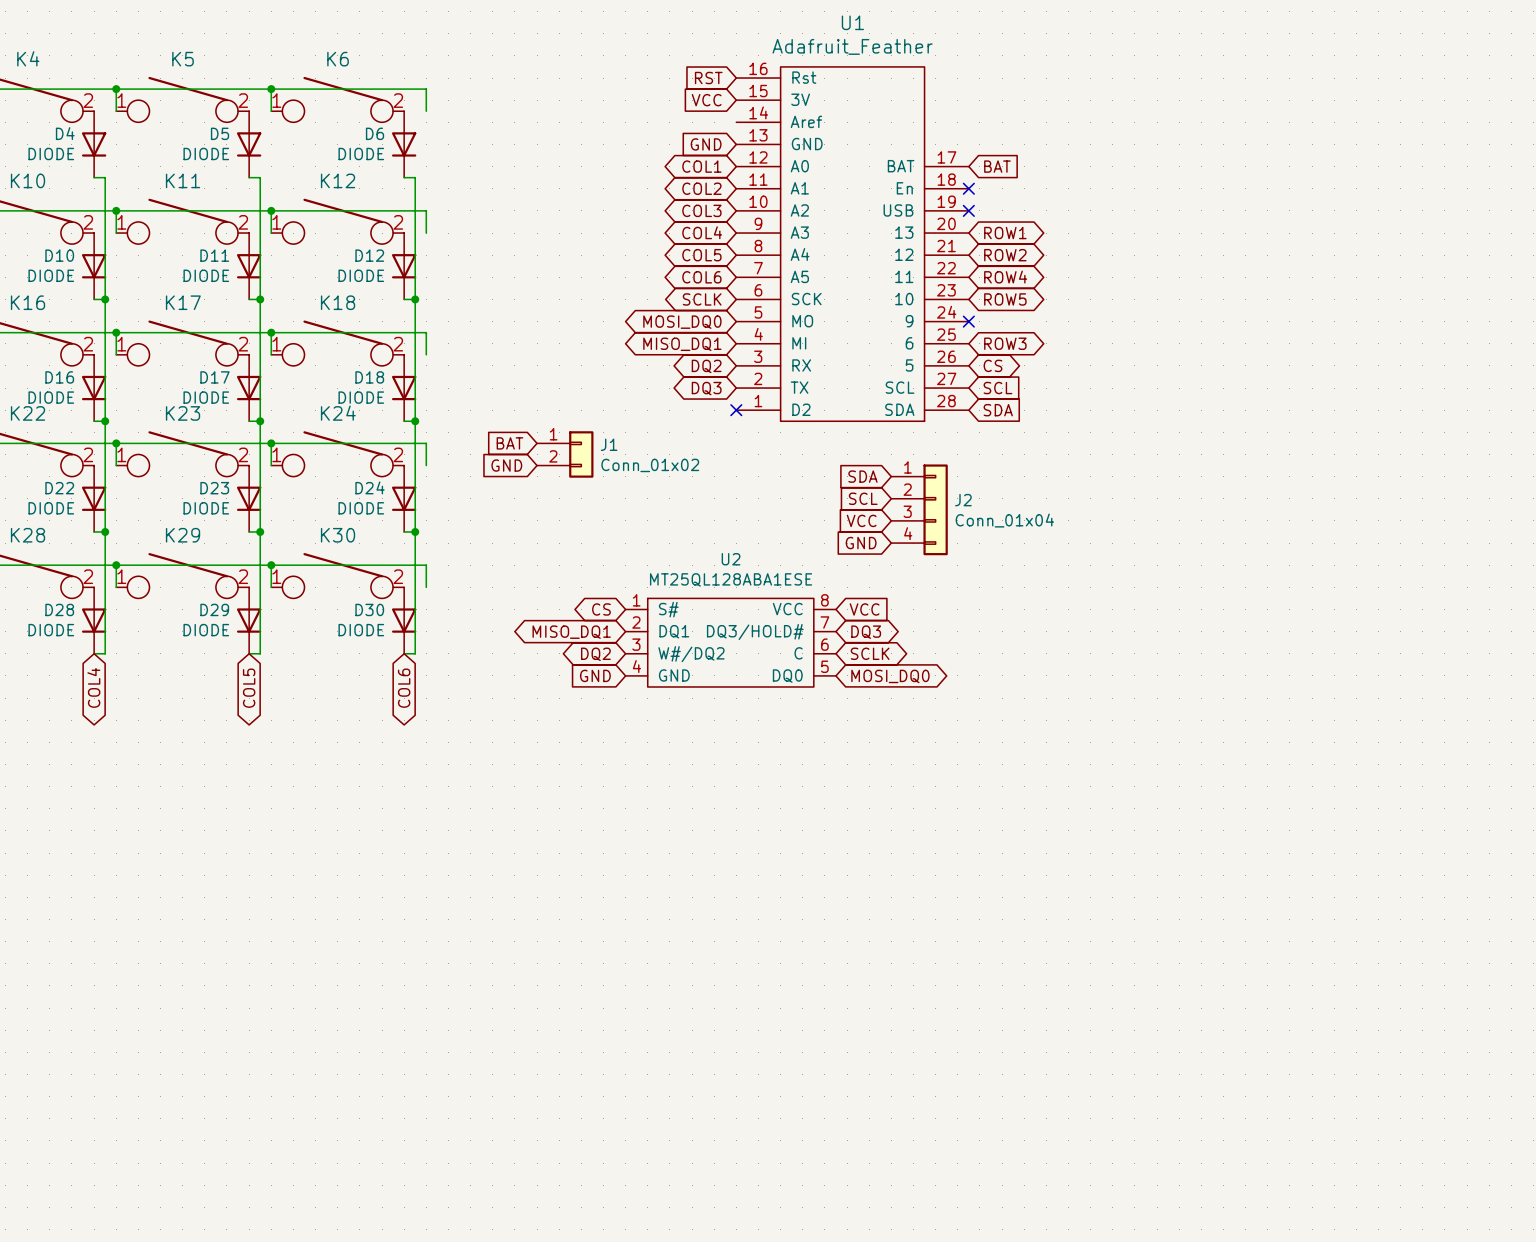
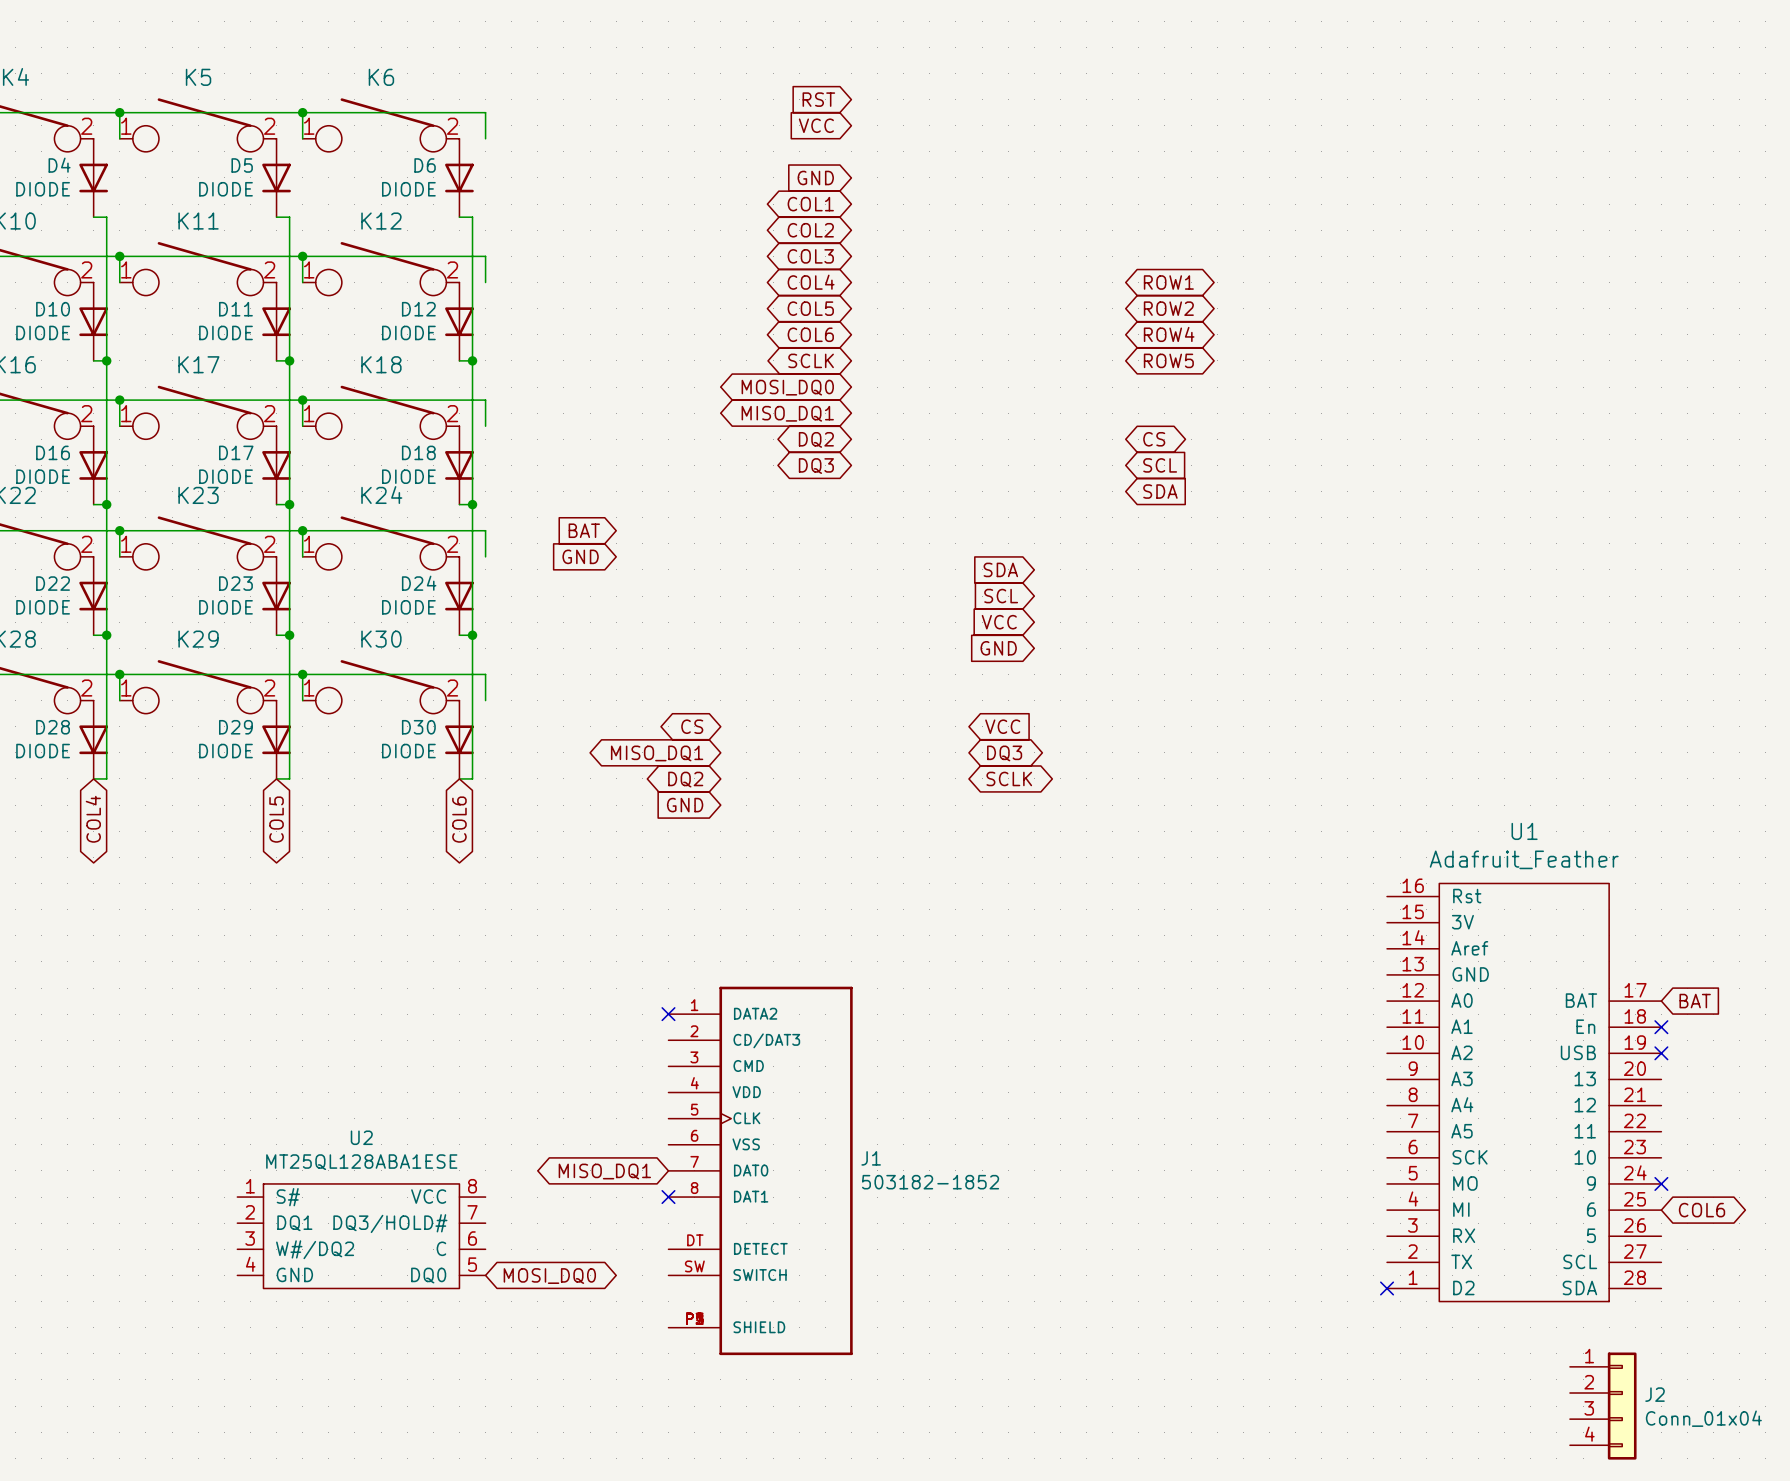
global label: BAT (997, 166) -> none
no-connect mark: (968, 188) -> none
no-connect mark: (968, 210) -> none
U1 position: (852, 244) -> (1524, 1092)
no-connect mark: (968, 321) -> none
global label: ROW3 (1005, 343) -> none
no-connect mark: (736, 410) -> none
J1 symbol: [537, 431, 594, 478] -> [668, 986, 853, 1356]
J1 name position: J1 (609, 444) -> J1 (871, 1158)
J1 value: Conn_01x02 (650, 465) -> 503182-1852 (930, 1182)
J2 position: (919, 509) -> (1603, 1406)
U2 position: (730, 642) -> (361, 1236)
global label: MOSI_DQ0 (890, 676) -> none
global label: none -> BAT (1695, 1001)
no-connect mark: none -> (668, 1014)
no-connect mark: none -> (1661, 1027)
no-connect mark: none -> (1661, 1053)
global label: none -> MISO_DQ1 (604, 1171)
no-connect mark: none -> (1661, 1183)
no-connect mark: none -> (668, 1197)
global label: none -> COL6 (1702, 1210)
global label: none -> MOSI_DQ0 (549, 1276)
no-connect mark: none -> (1387, 1288)

